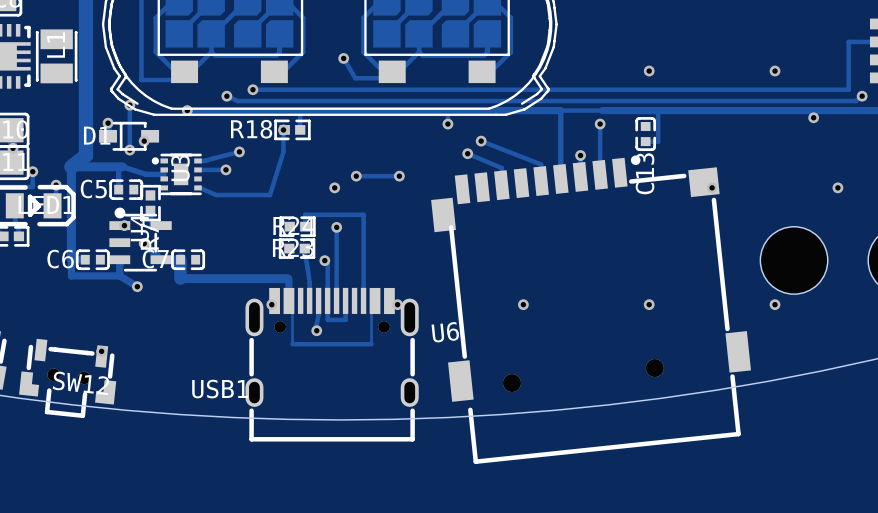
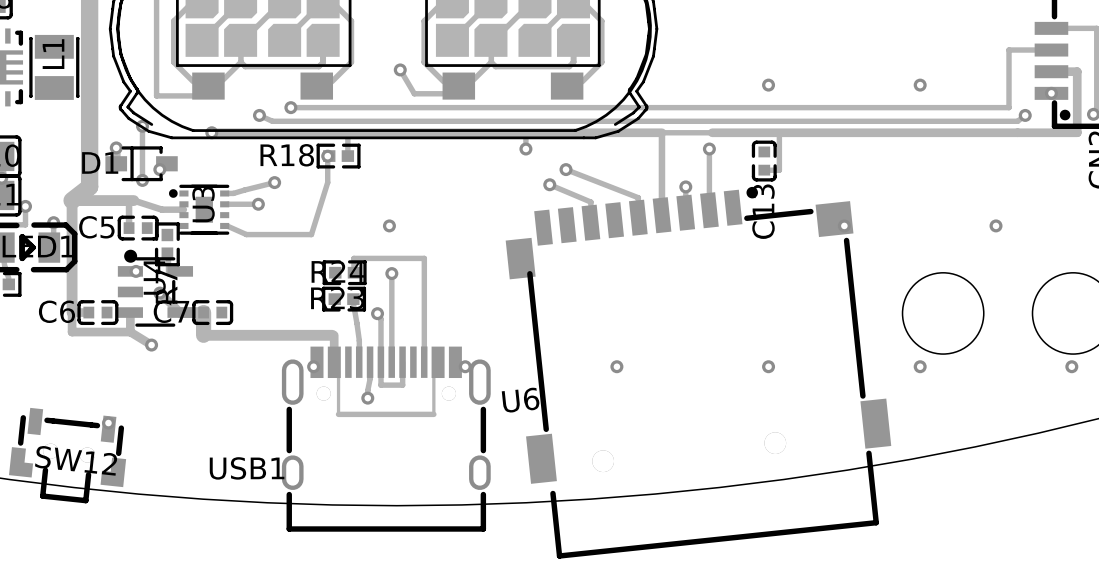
via: (813, 117) -> none
track: (356, 176) (399, 176) -> none
via: (356, 176) -> none
via: (399, 176) -> none

